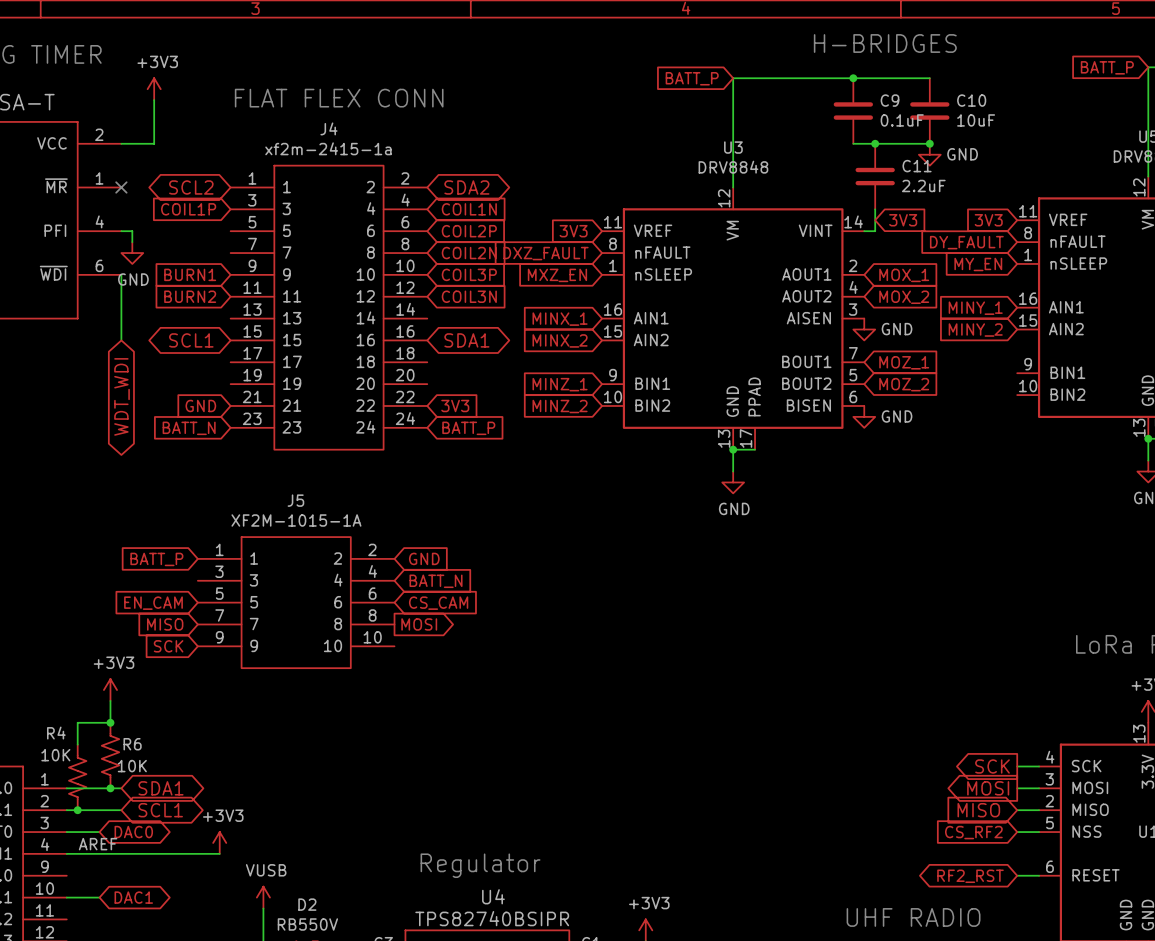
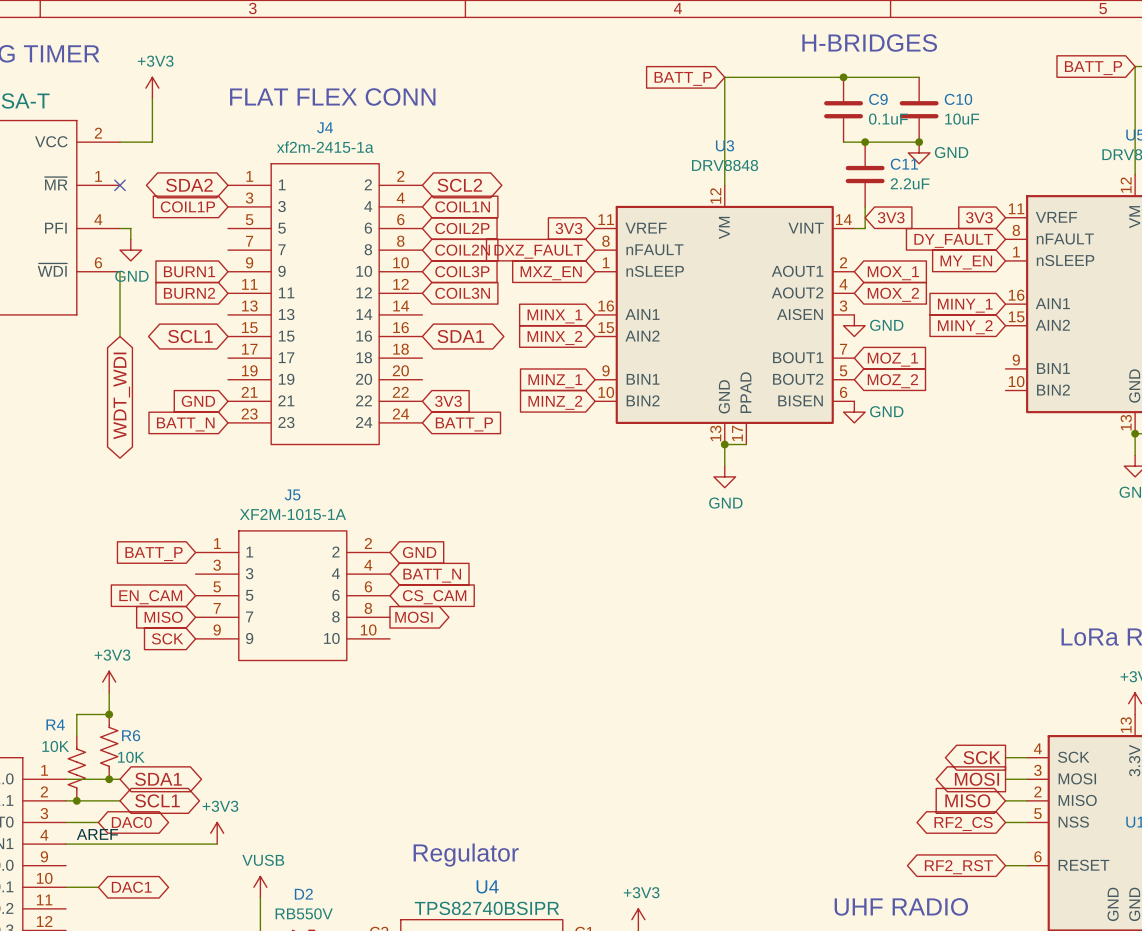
global label: SCL2 (191, 187) -> SDA2 (189, 185)
global label: SDA2 (466, 187) -> SCL2 (459, 185)
global label shape: input (973, 832) -> bidirectional (963, 823)
global label: CS_RF2 (973, 832) -> RF2_CS (963, 823)

